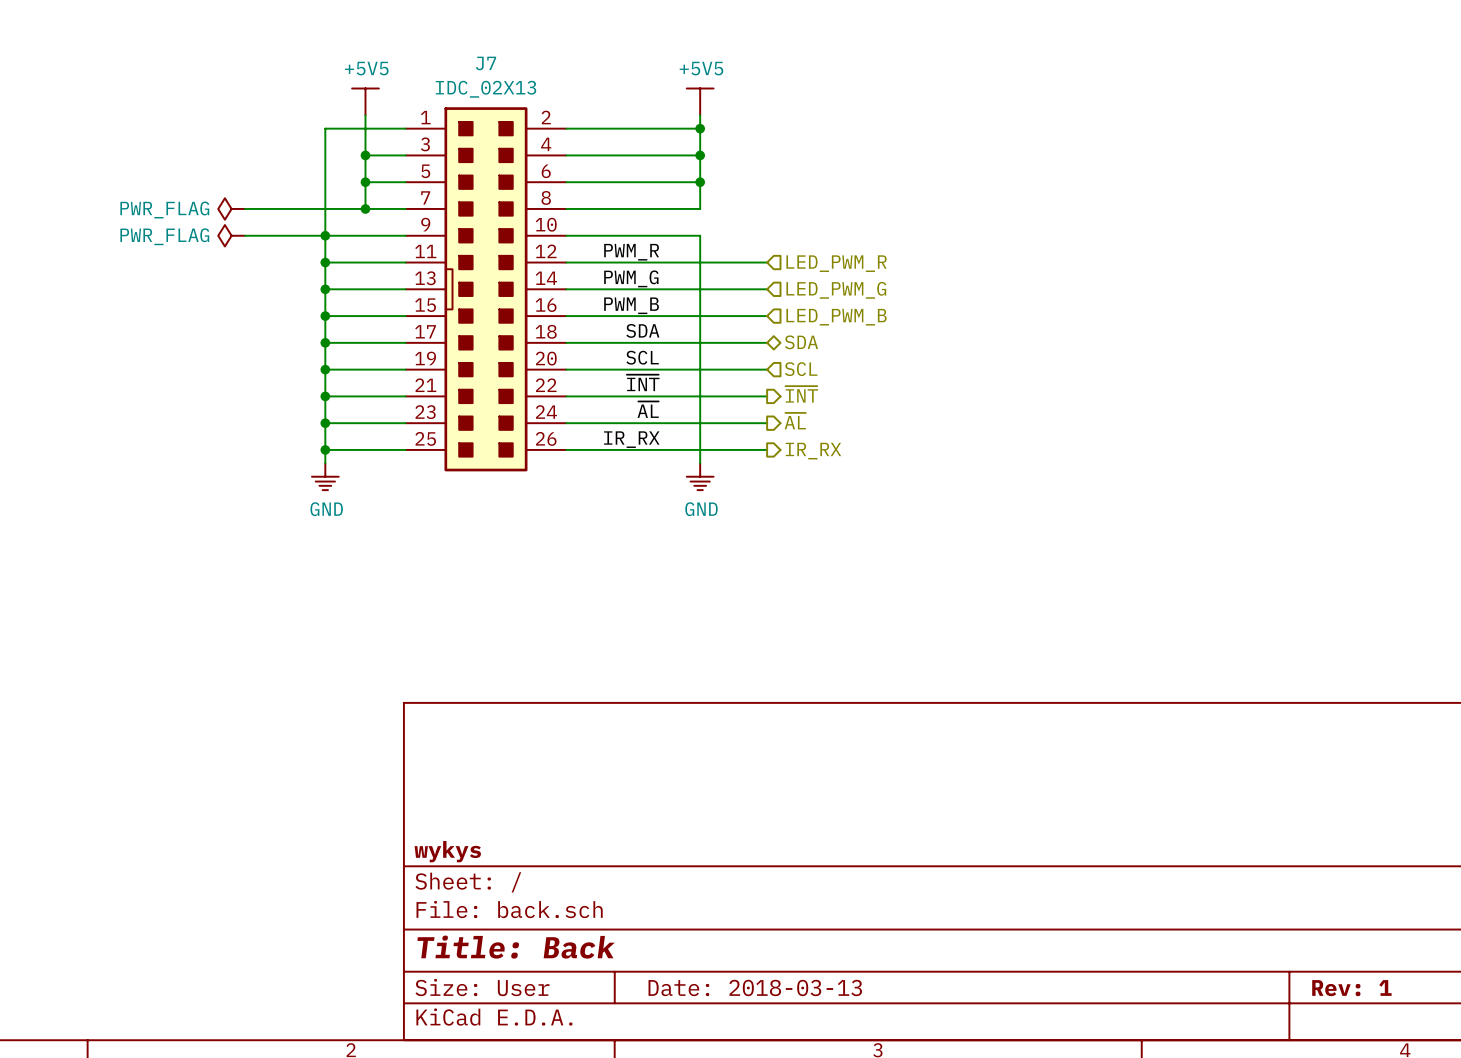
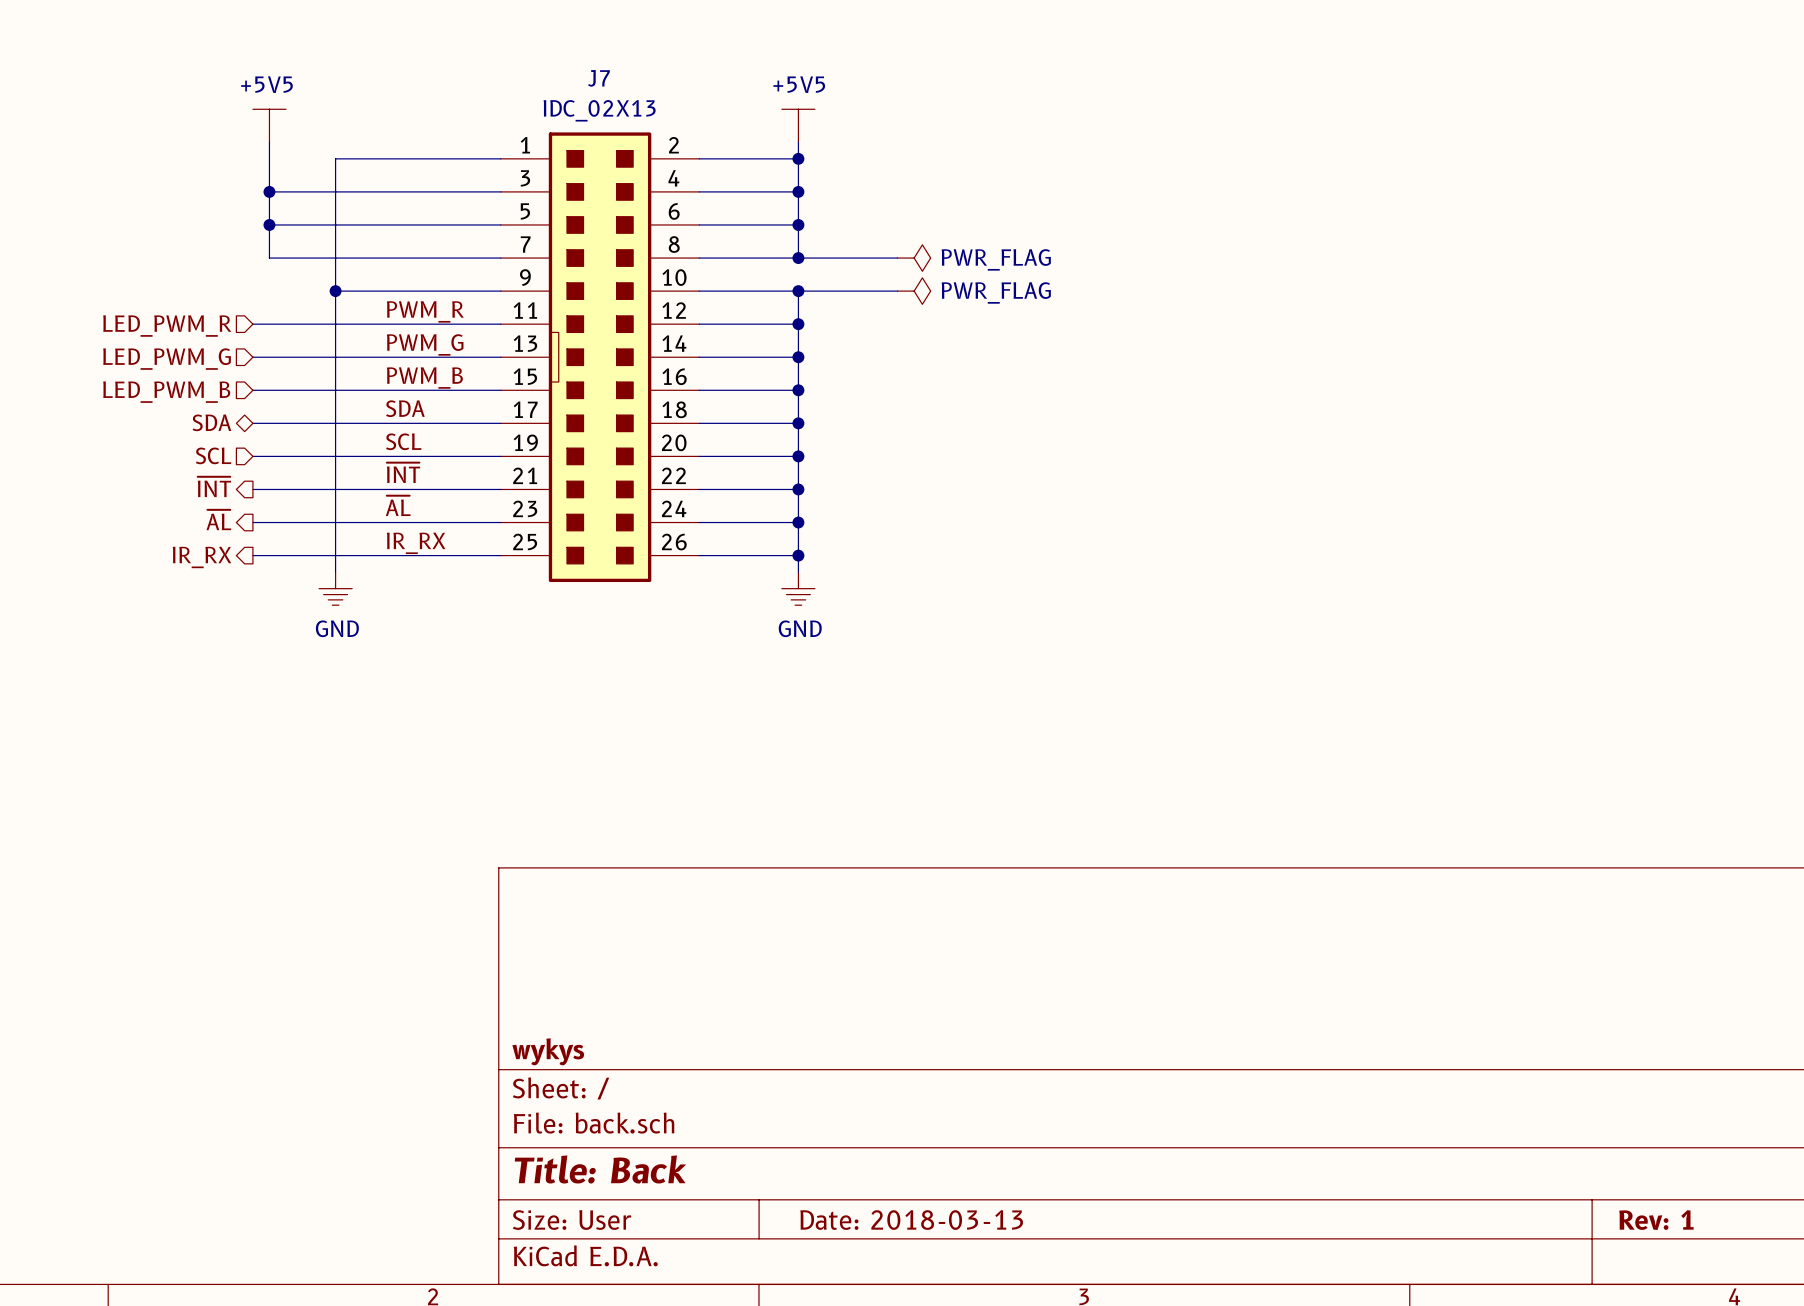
power symbol: none -> +5V5 (269, 125)
power symbol: +5V5 (365, 101) -> none
power symbol position: +5V5 (700, 101) -> +5V5 (798, 125)
wire: none -> (269, 142) (269, 258) (302, 258)
wire: (365, 115) (365, 208) -> none
wire: none -> (798, 142) (798, 258)
wire: (700, 115) (700, 208) -> (897, 258) (864, 258)
wire: (325, 128) (325, 463) -> (401, 158) (335, 158) (335, 572)
wire: (646, 128) (700, 128) -> none
junction: none -> (798, 158)
junction: (700, 128) -> none
wire: none -> (269, 191) (451, 191)
junction: none -> (269, 191)
junction: (365, 155) -> none
wire: (646, 155) (700, 155) -> none
junction: none -> (798, 191)
junction: (700, 155) -> none
wire: none -> (269, 224) (451, 224)
junction: none -> (269, 224)
junction: (365, 182) -> none
wire: (646, 182) (700, 182) -> none
junction: none -> (798, 224)
junction: (700, 182) -> none
power symbol: PWR_FLAG (231, 208) -> none
junction: (365, 208) -> none
junction: none -> (798, 258)
power symbol: none -> PWR_FLAG (914, 258)
power symbol: PWR_FLAG (231, 235) -> none
wire: (245, 235) (271, 235) -> none
junction: none -> (335, 291)
junction: (325, 235) -> none
wire: none -> (798, 291) (798, 572)
junction: none -> (798, 291)
wire: (700, 235) (700, 463) -> (864, 291) (897, 291)
power symbol: none -> PWR_FLAG (914, 291)
label: none -> PWM_R (425, 311)
label: PWM_R (631, 252) -> none
wire: none -> (252, 324) (401, 324)
junction: (325, 262) -> none
wire: (646, 262) (767, 262) -> none
junction: none -> (798, 324)
hierarchical label: none -> LED_PWM_R (167, 326)
hierarchical label: LED_PWM_R (836, 263) -> none
label: none -> PWM_G (425, 344)
label: PWM_G (631, 278) -> none
wire: none -> (252, 357) (401, 357)
junction: (325, 289) -> none
wire: (646, 289) (767, 289) -> none
junction: none -> (798, 357)
hierarchical label: none -> LED_PWM_G (167, 359)
hierarchical label: LED_PWM_G (836, 290) -> none
label: none -> PWM_B (424, 378)
label: PWM_B (631, 305) -> none
wire: none -> (252, 390) (401, 390)
junction: (325, 316) -> none
wire: (646, 316) (767, 316) -> none
junction: none -> (798, 390)
hierarchical label: none -> LED_PWM_B (166, 392)
hierarchical label: LED_PWM_B (836, 317) -> none
label: none -> SDA (405, 408)
label: SDA (642, 330) -> none
hierarchical label: none -> SDA (211, 422)
wire: none -> (252, 423) (401, 423)
junction: (325, 342) -> none
wire: (646, 342) (767, 342) -> none
junction: none -> (798, 423)
hierarchical label: SDA (801, 342) -> none
label: none -> SCL (403, 441)
label: SCL (642, 357) -> none
hierarchical label: none -> SCL (213, 455)
wire: none -> (252, 456) (401, 456)
junction: (325, 369) -> none
wire: (646, 369) (767, 369) -> none
junction: none -> (798, 456)
hierarchical label: SCL (801, 369) -> none
label: none -> ~{INT} (403, 472)
label: ~{INT} (643, 382) -> none
hierarchical label: none -> ~{INT} (214, 486)
hierarchical label: ~{INT} (801, 394) -> none
wire: none -> (252, 489) (401, 489)
junction: (325, 396) -> none
wire: (646, 396) (767, 396) -> none
junction: none -> (798, 489)
label: none -> ~{AL} (398, 505)
label: ~{AL} (648, 409) -> none
hierarchical label: none -> ~{AL} (218, 520)
hierarchical label: ~{AL} (795, 421) -> none
wire: none -> (252, 522) (401, 522)
junction: (325, 423) -> none
wire: (646, 423) (767, 423) -> none
junction: none -> (798, 522)
label: none -> IR_RX (416, 543)
label: IR_RX (631, 439) -> none
wire: none -> (252, 555) (401, 555)
junction: (325, 449) -> none
wire: (646, 449) (767, 449) -> none
junction: none -> (798, 555)
hierarchical label: none -> IR_RX (201, 557)
hierarchical label: IR_RX (813, 451) -> none
power symbol position: GND (325, 476) -> GND (335, 588)
power symbol position: GND (700, 476) -> GND (798, 588)

